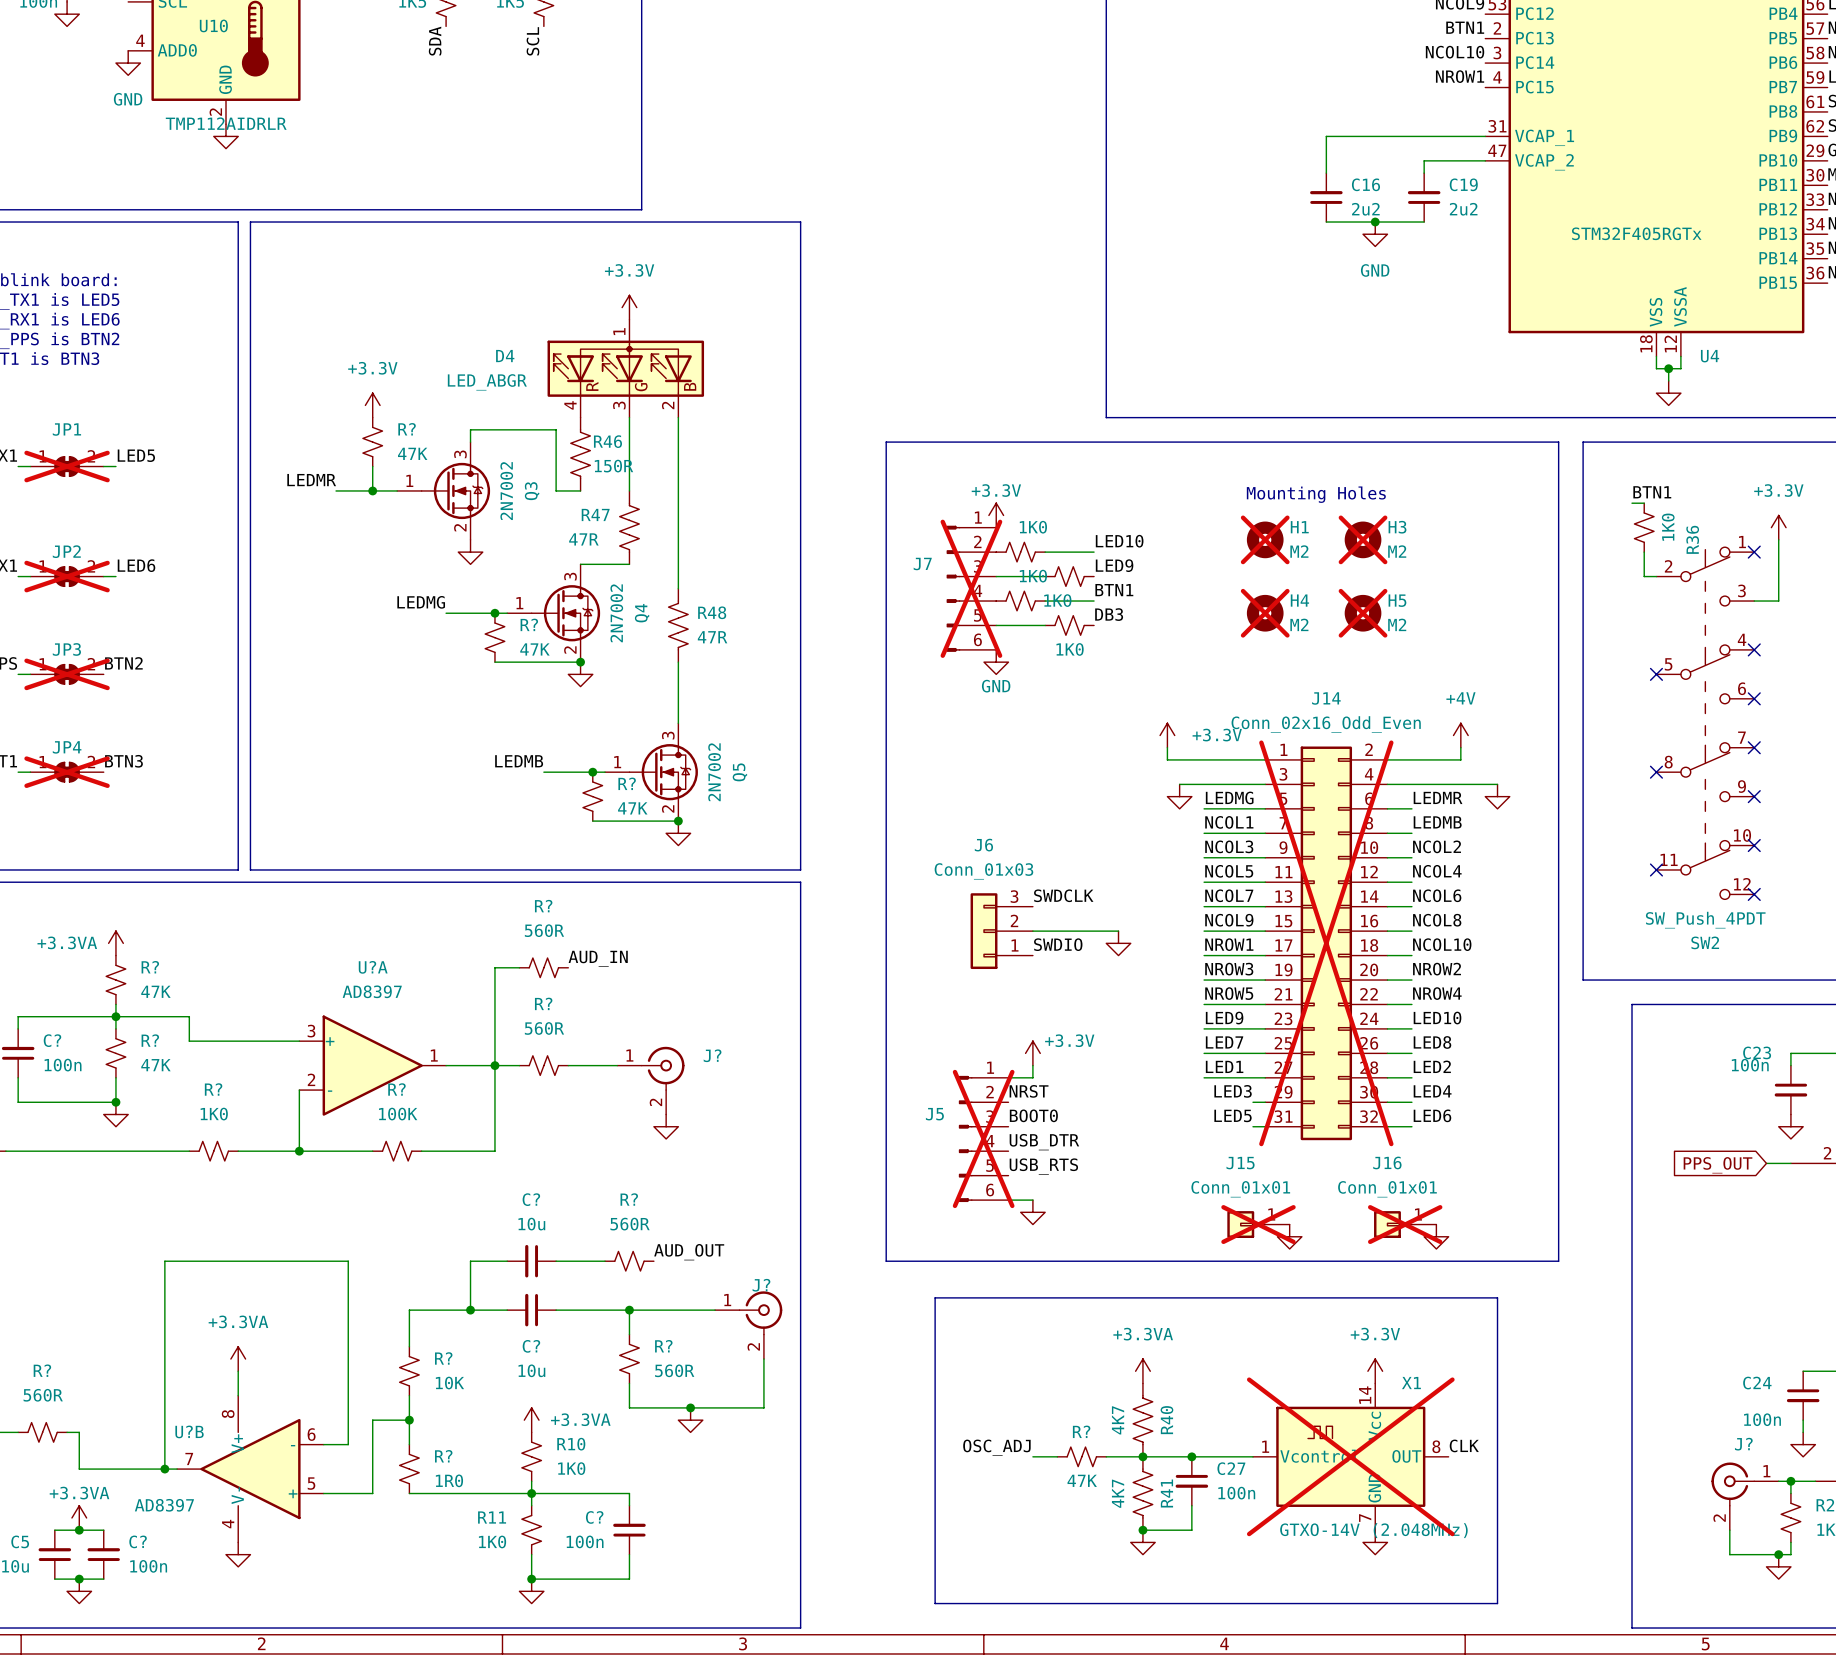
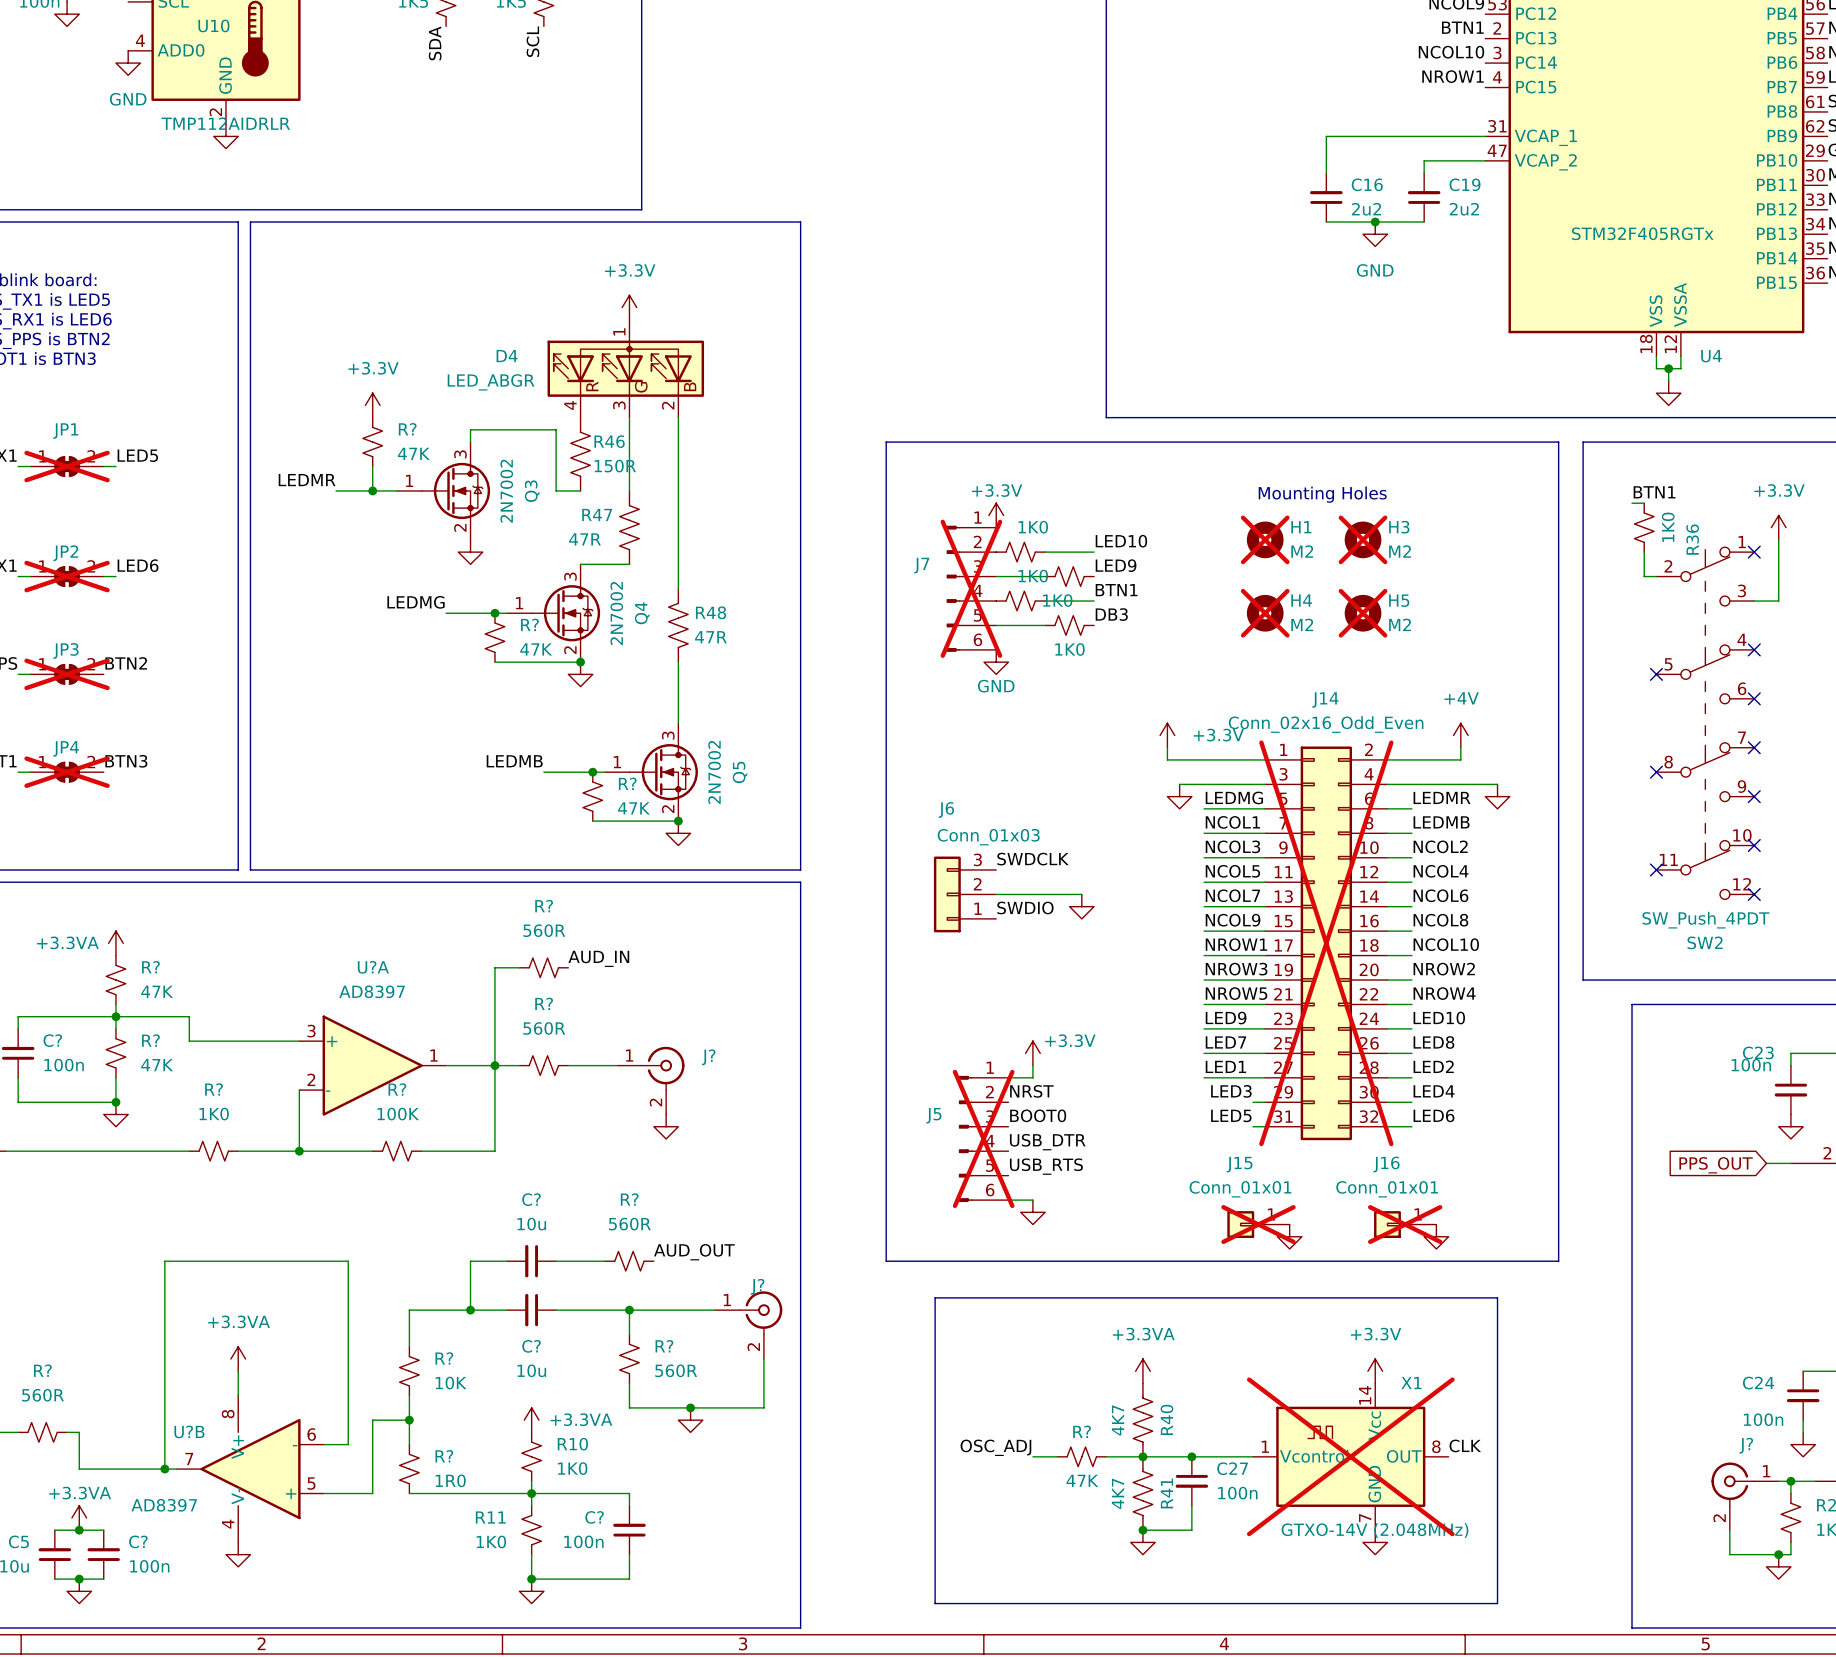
J6 value position: Conn_01x03 (983, 871) -> Conn_01x03 (988, 837)
label position: SWDCLK (1063, 895) -> SWDCLK (1033, 859)
J6 position: (1001, 931) -> (965, 894)
wire: (1032, 931) (1118, 931) -> (996, 894) (1081, 894)
power symbol position: (1118, 943) -> (1081, 906)
label position: SWDIO (1058, 944) -> SWDIO (1025, 907)

